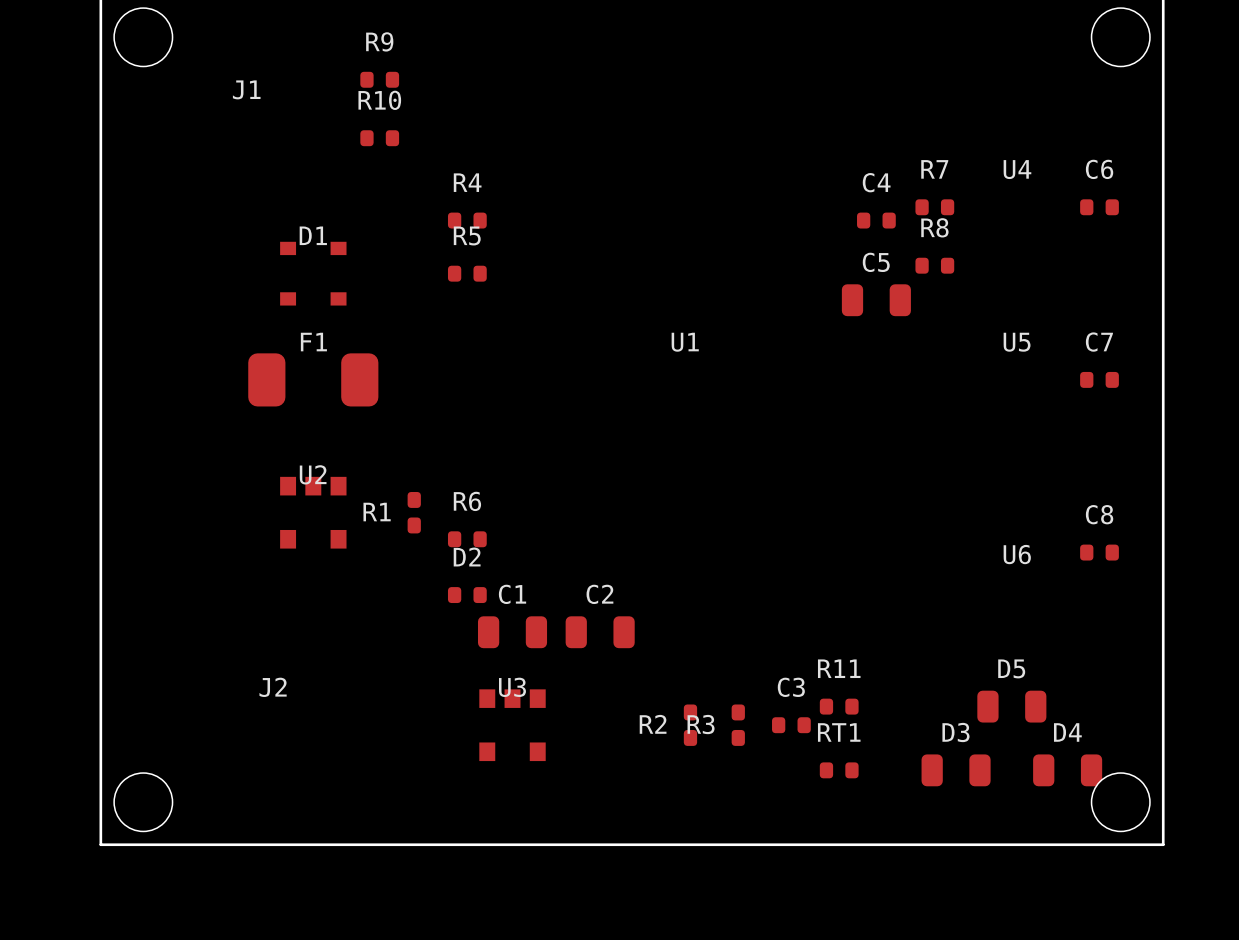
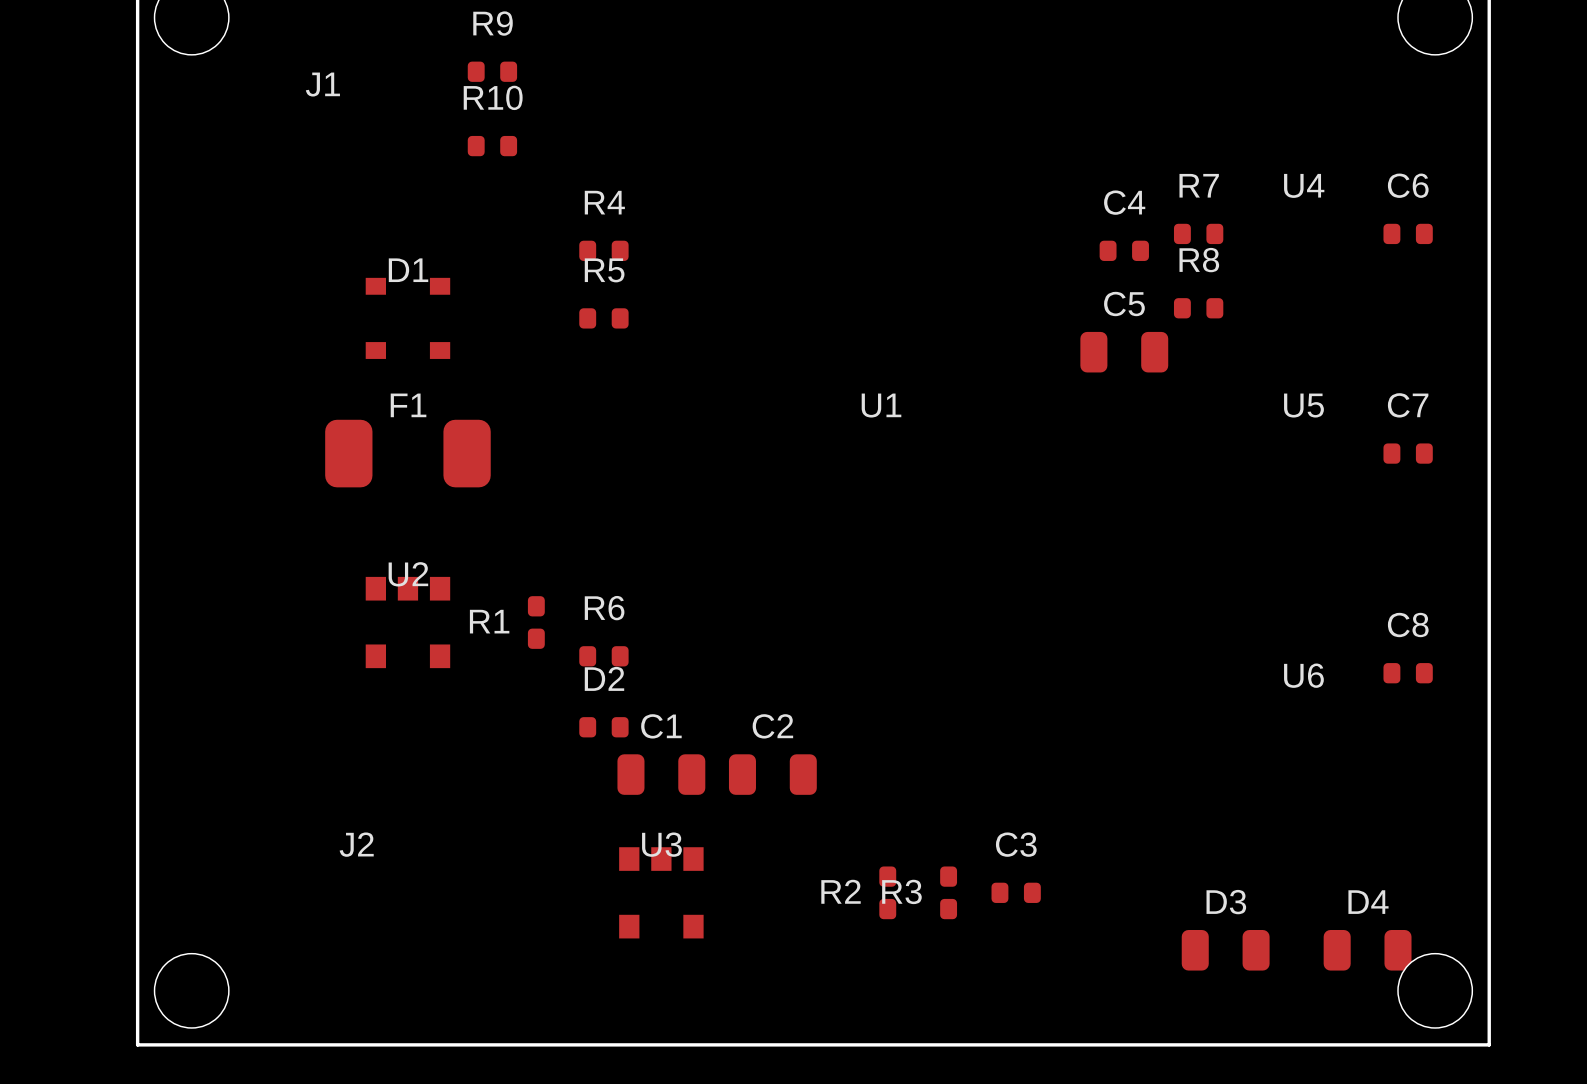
R11: (839, 706) -> none
D5: (1011, 706) -> none
RT1: (839, 770) -> none

